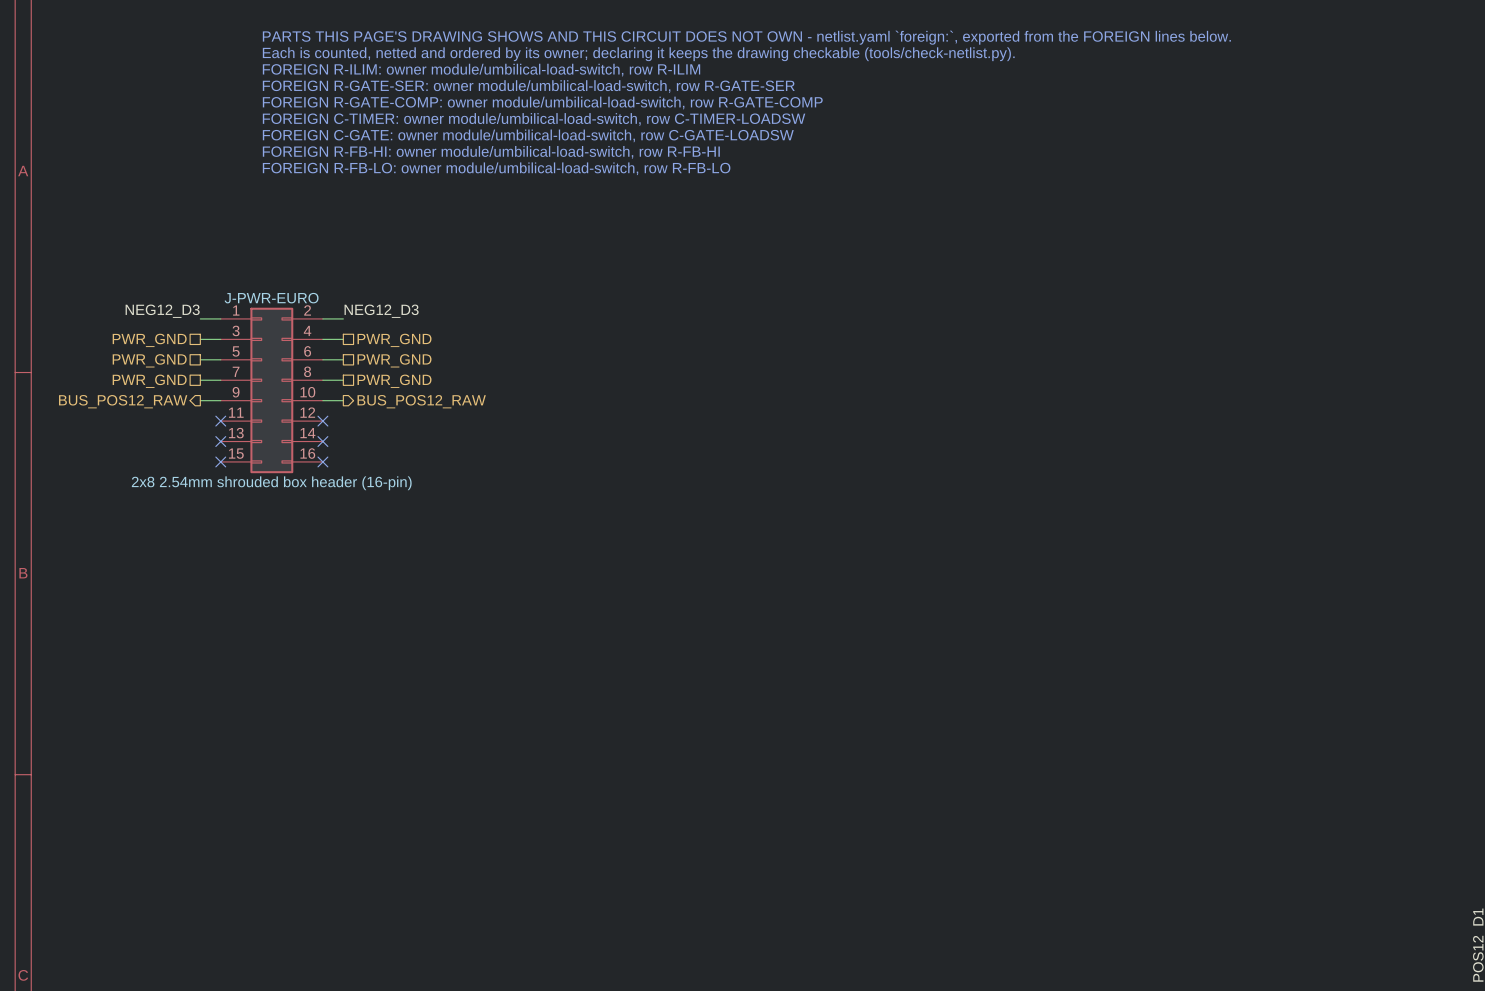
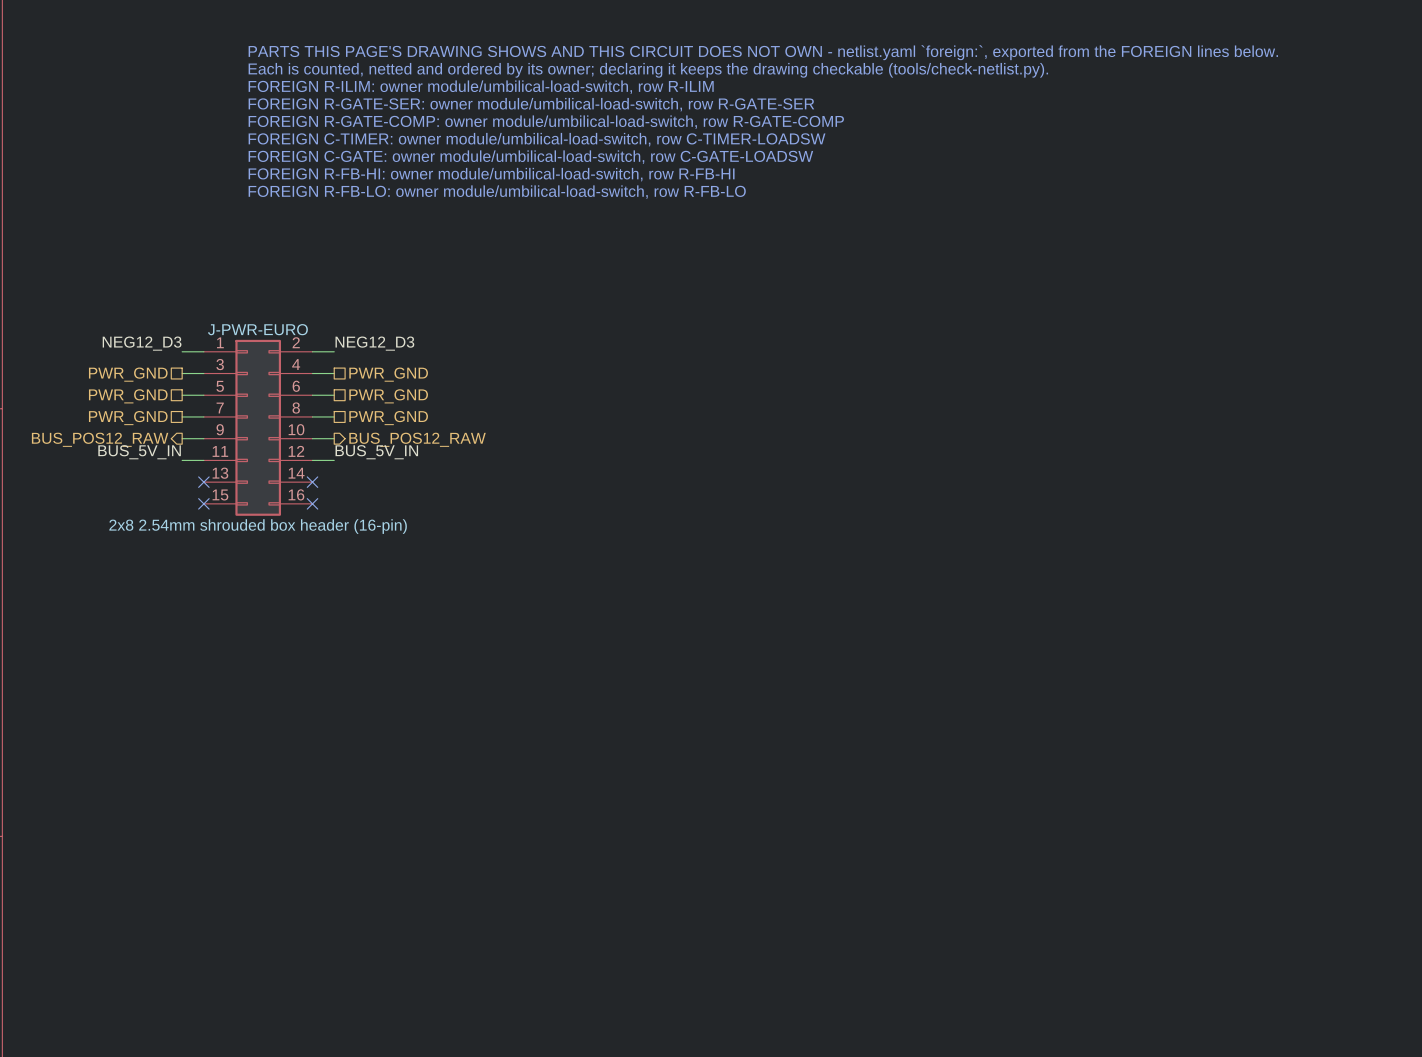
label: none -> BUS_5V_IN (139, 452)
label: none -> BUS_5V_IN (376, 452)
wire: none -> (182, 460) (203, 460)
no-connect mark: (220, 421) -> none
wire: none -> (312, 460) (334, 460)
no-connect mark: (322, 421) -> none

